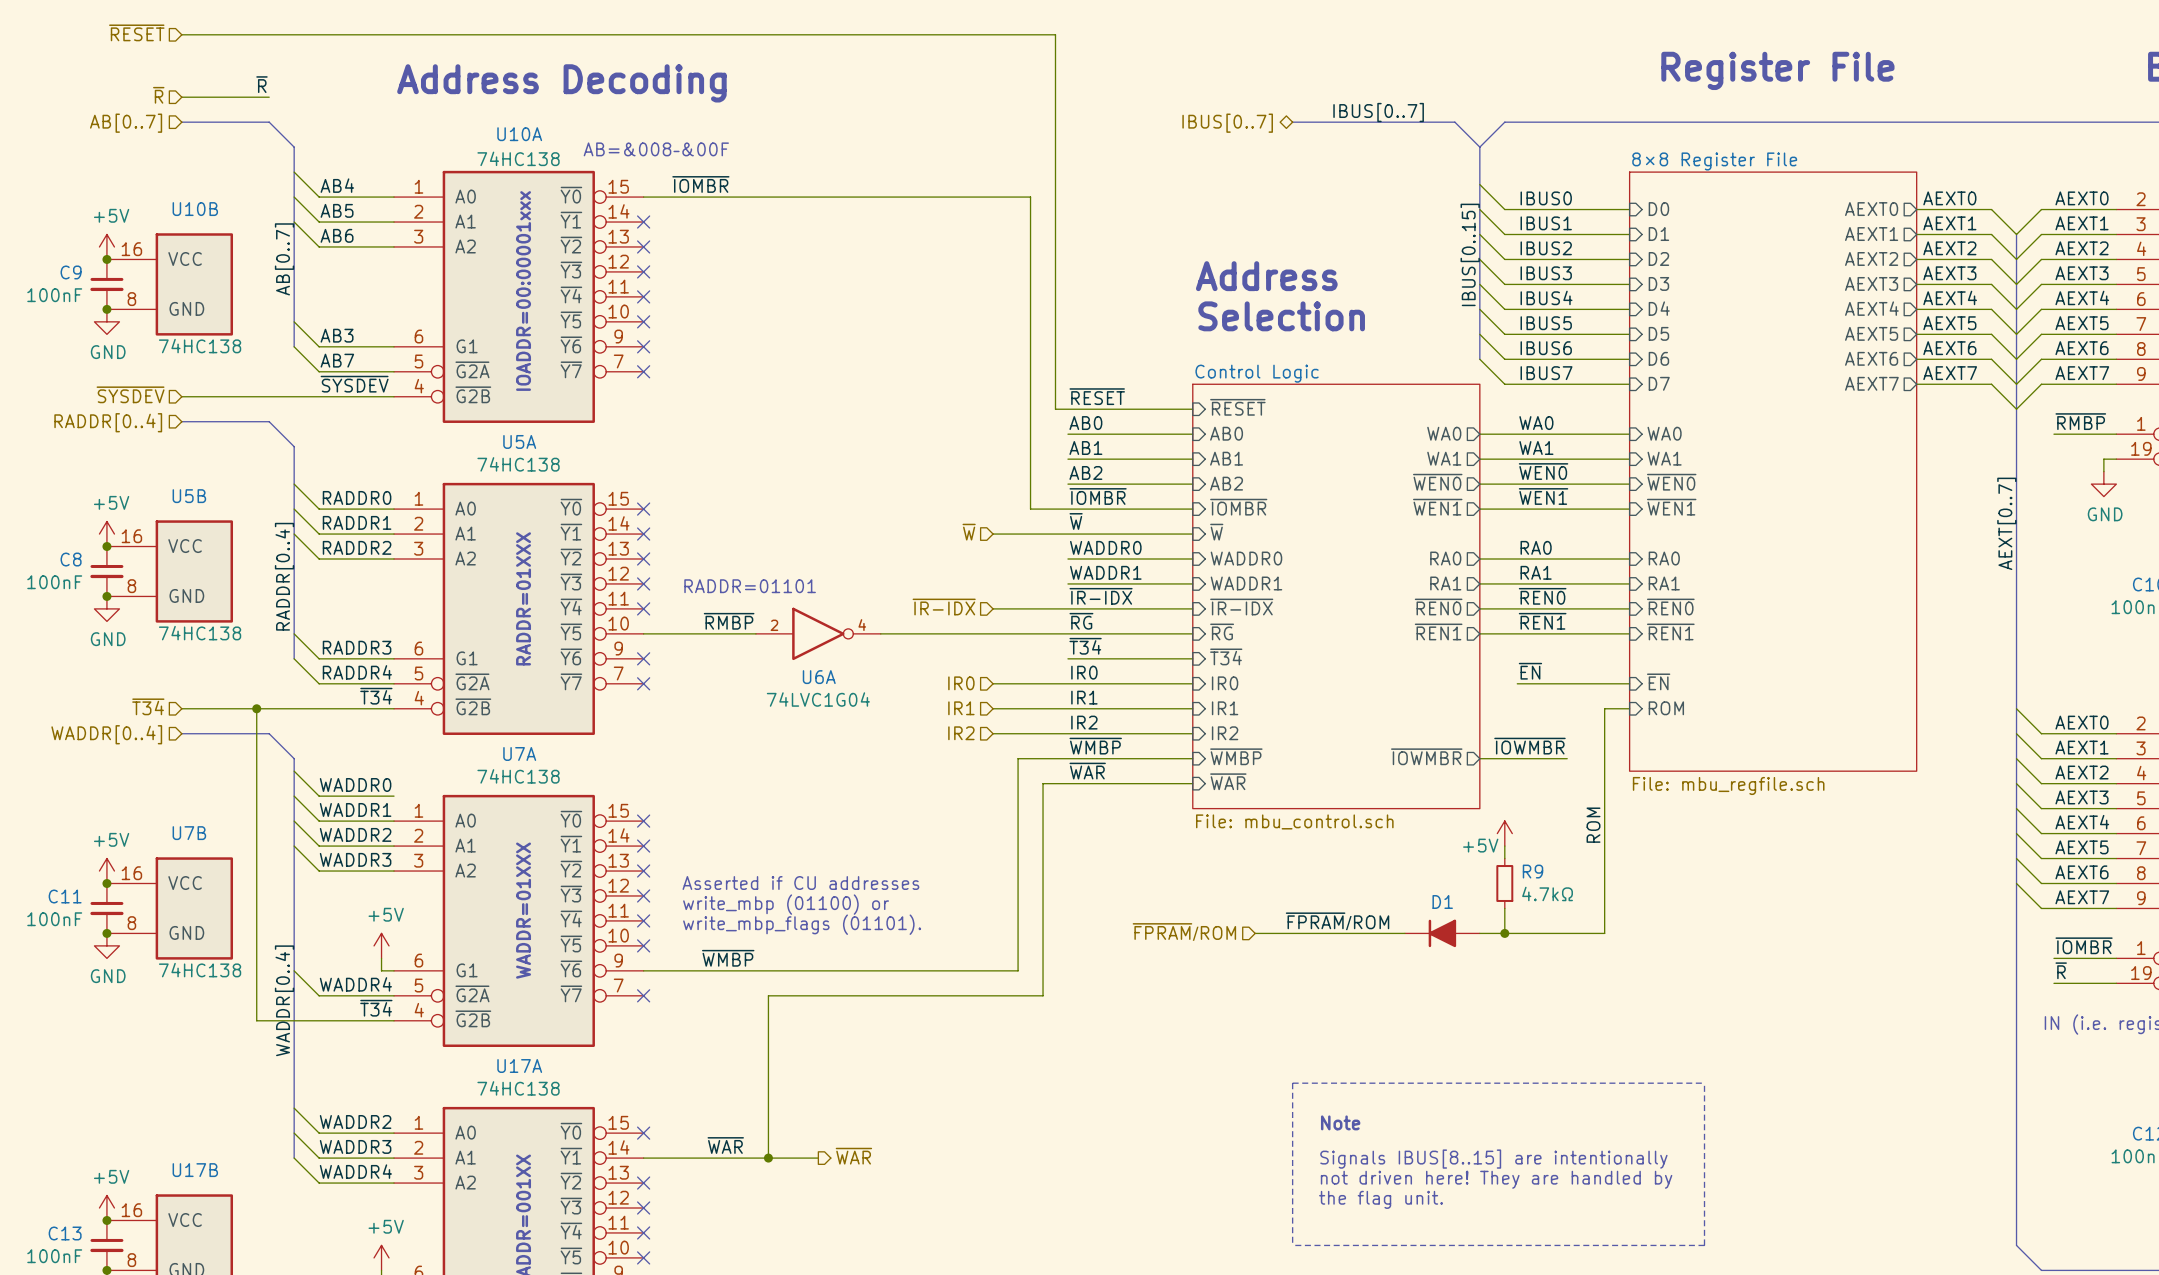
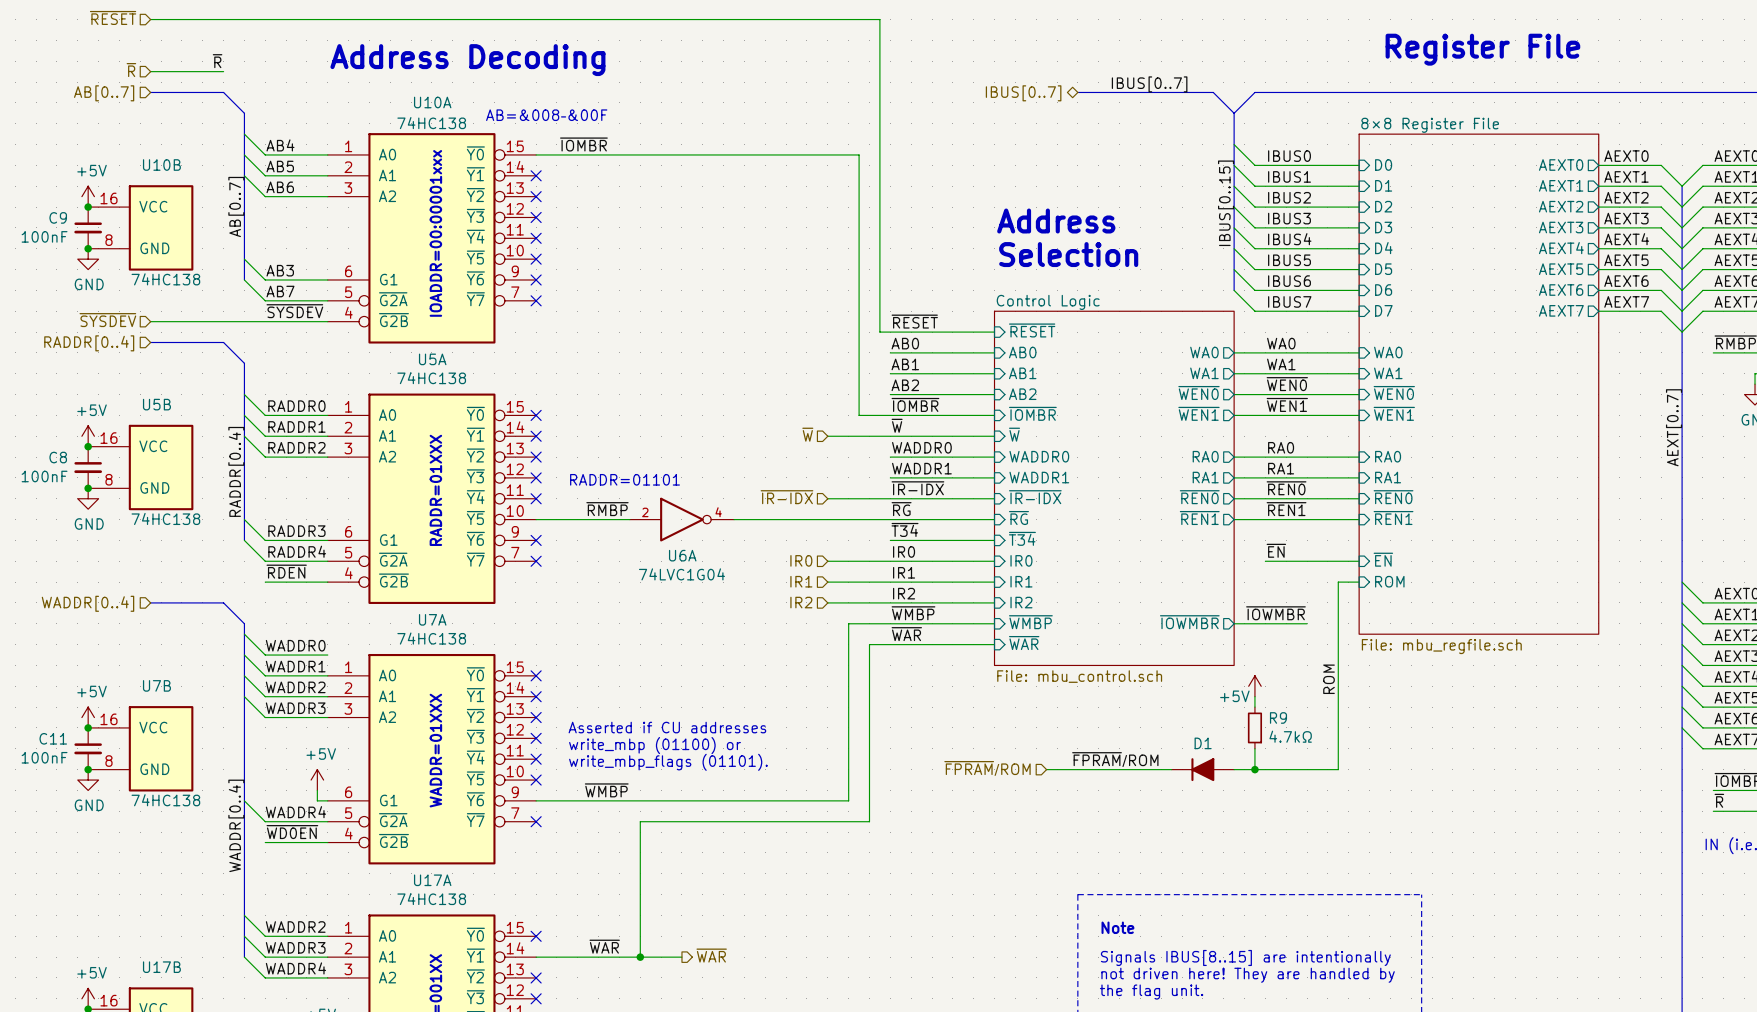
label: none -> ~{RDEN} (286, 571)
label: ~{T34} (376, 696) -> none
hierarchical label: ~{T34} (148, 706) -> none
wire: (181, 708) (319, 708) -> none
wire: (256, 708) (256, 1020) (319, 1020) -> none
junction: (256, 708) -> none
label: none -> ~{WD0EN} (292, 832)
label: ~{T34} (376, 1008) -> none

